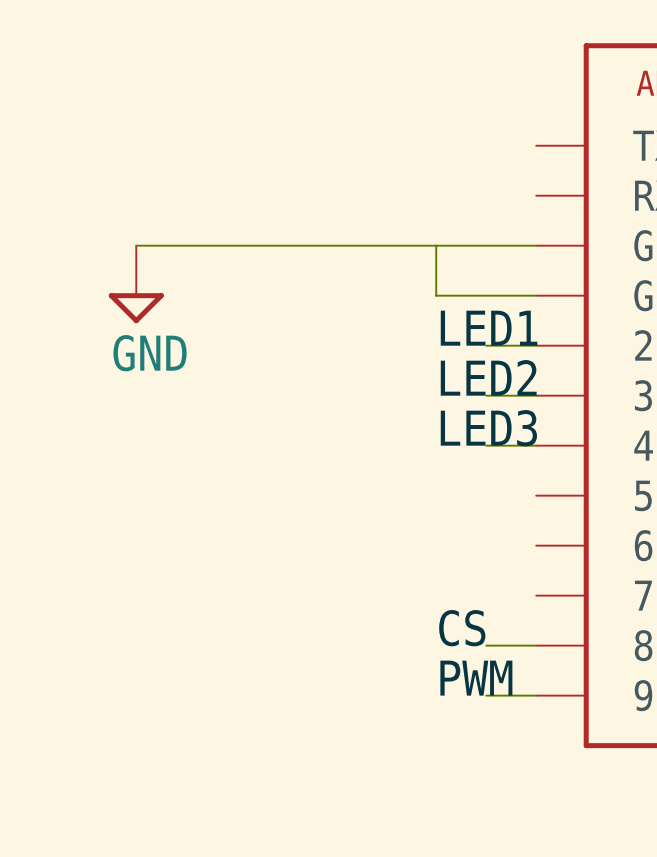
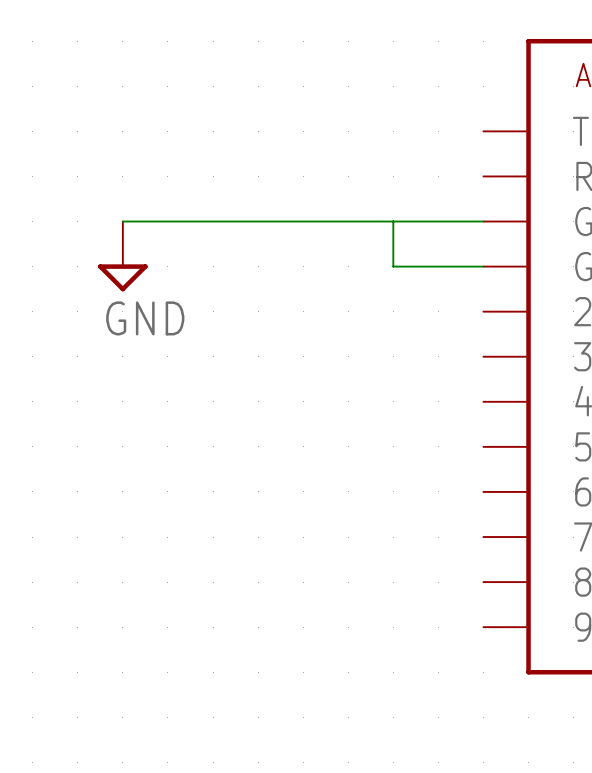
label: LED1 (489, 328) -> none
wire: (486, 345) (536, 345) -> none
label: LED2 (488, 377) -> none
wire: (486, 395) (536, 395) -> none
label: LED3 (488, 428) -> none
wire: (486, 445) (536, 445) -> none
label: CS (462, 628) -> none
wire: (486, 645) (536, 645) -> none
label: PWM (476, 678) -> none
wire: (486, 695) (536, 695) -> none

